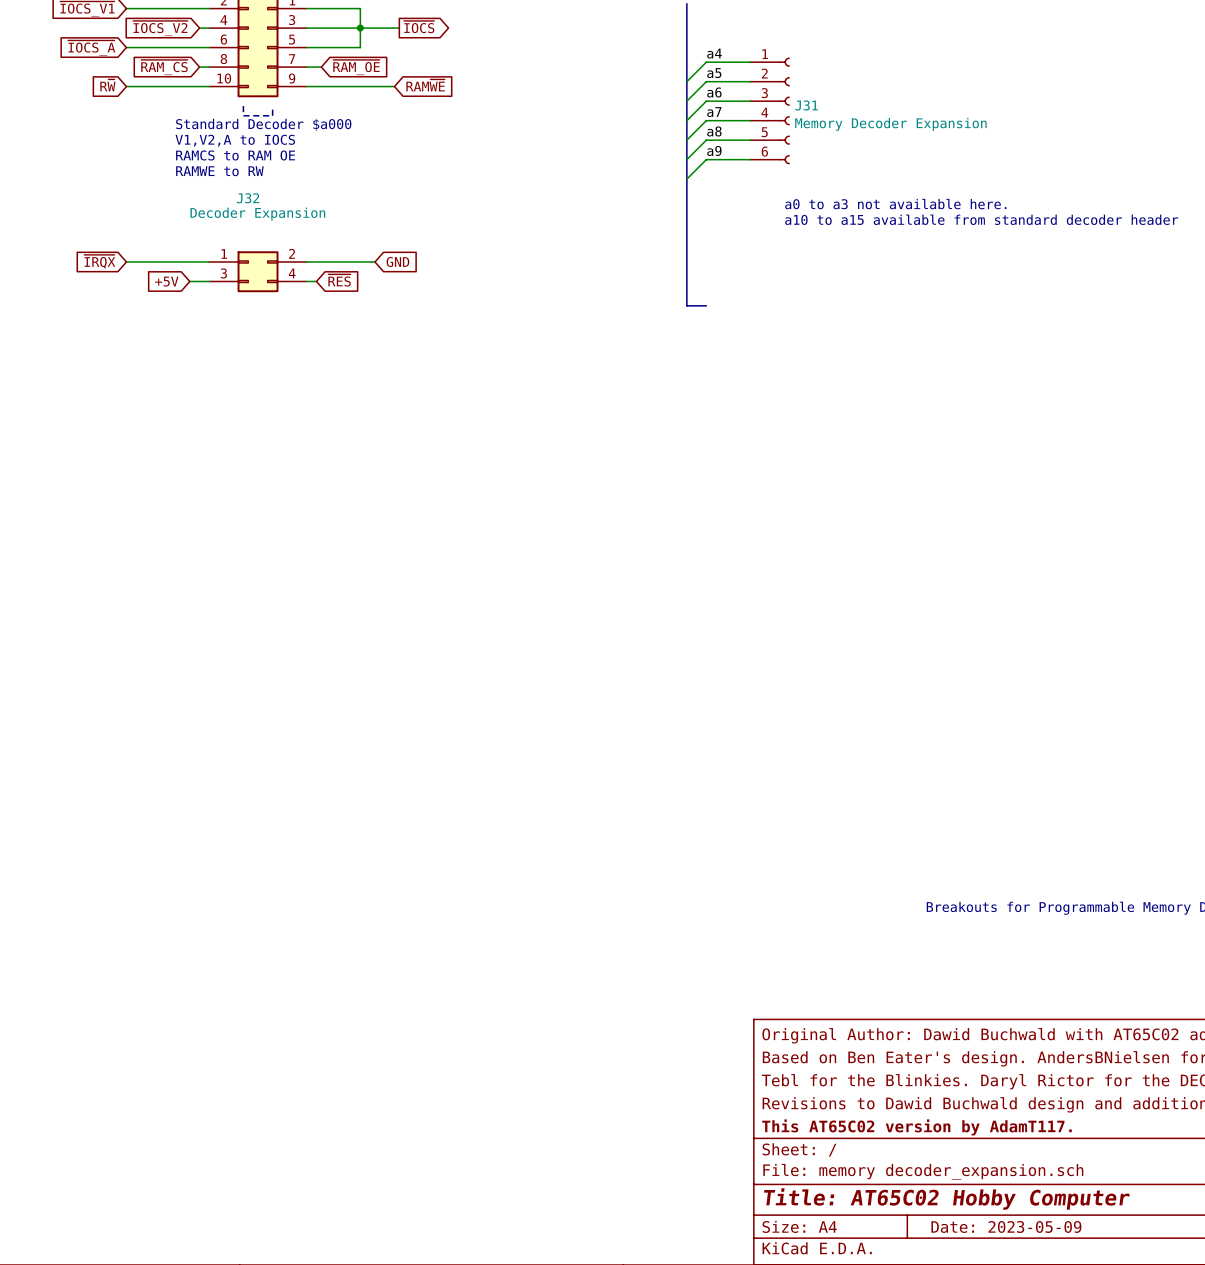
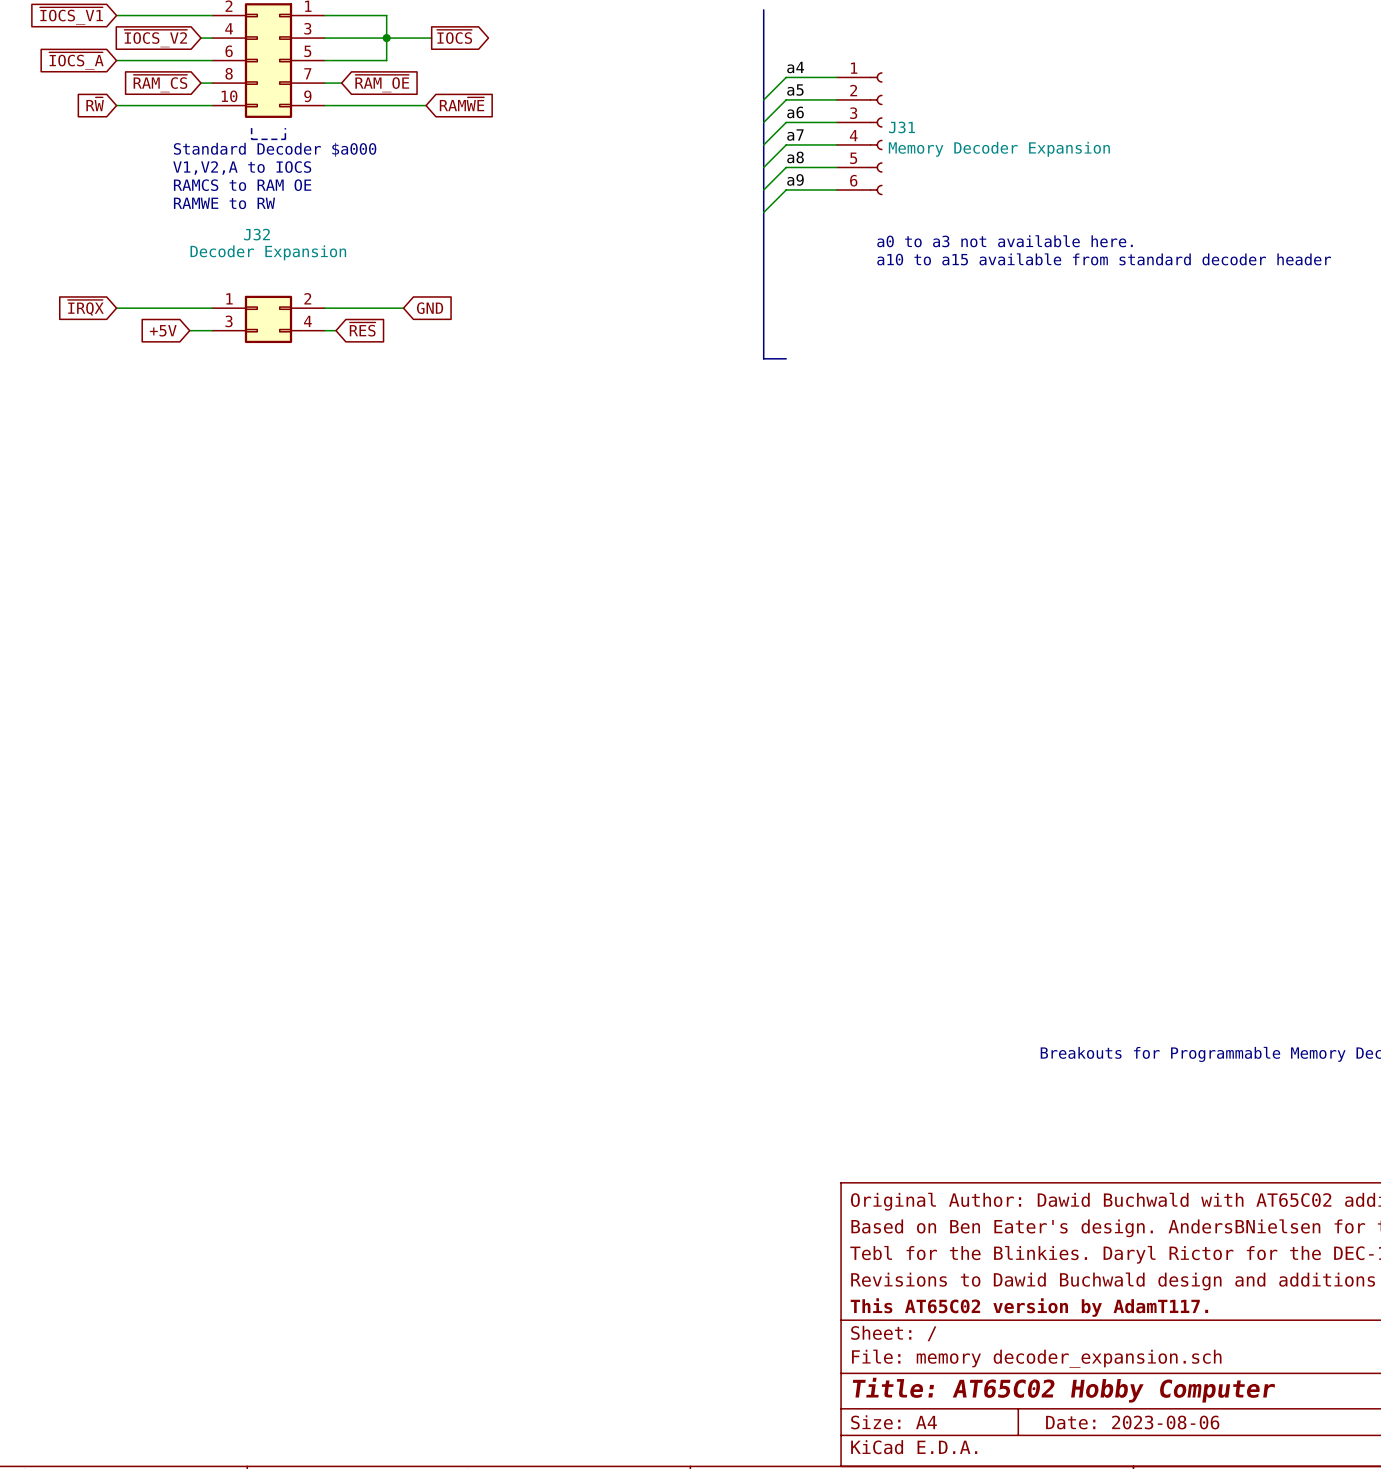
title block: Date: 2023-05-09 (1006, 1226) -> Date: 2023-08-06 (1132, 1422)

